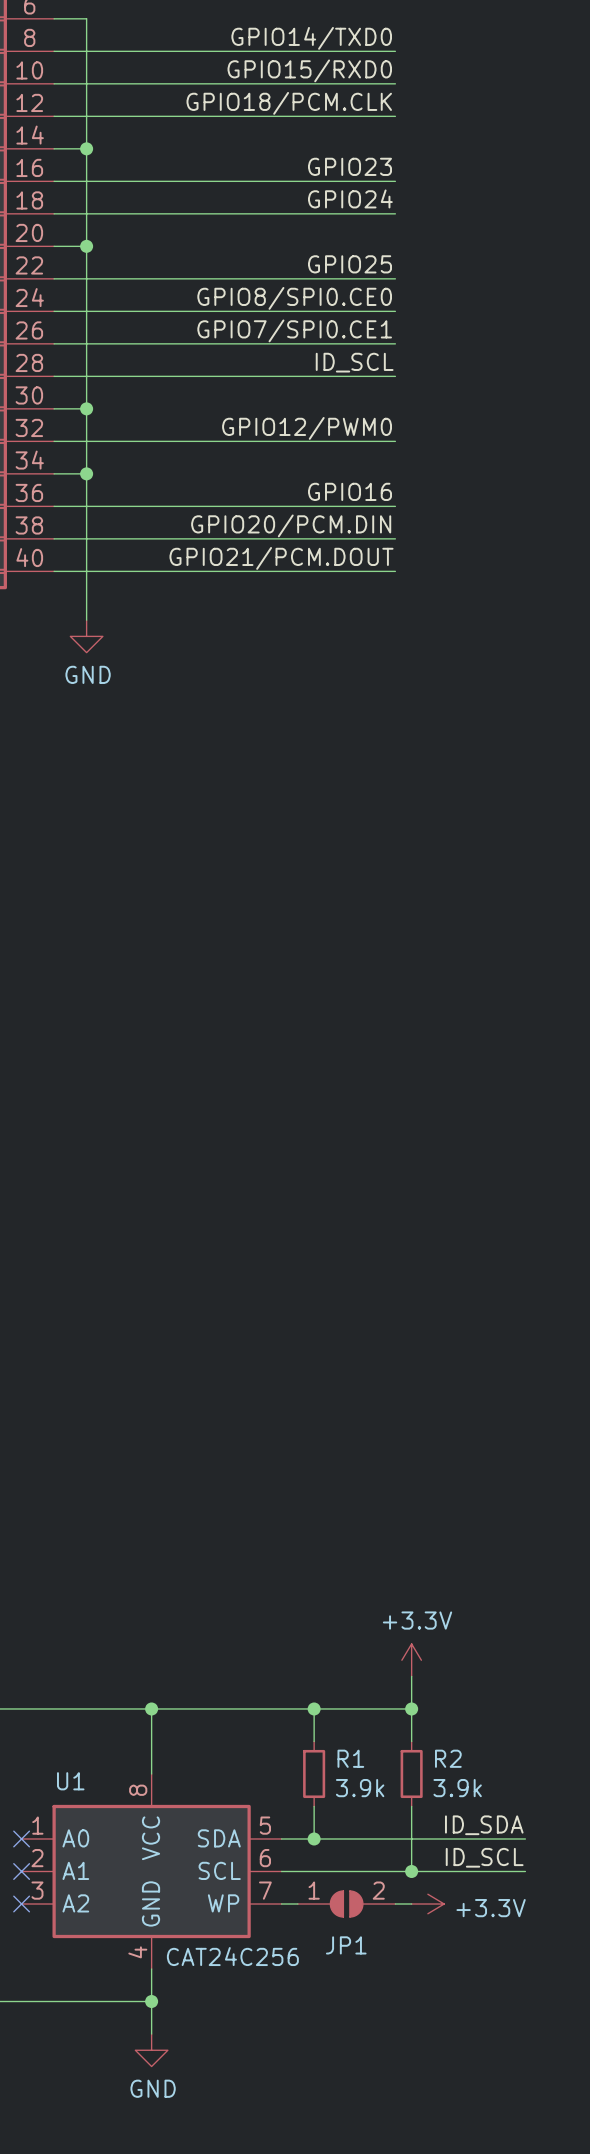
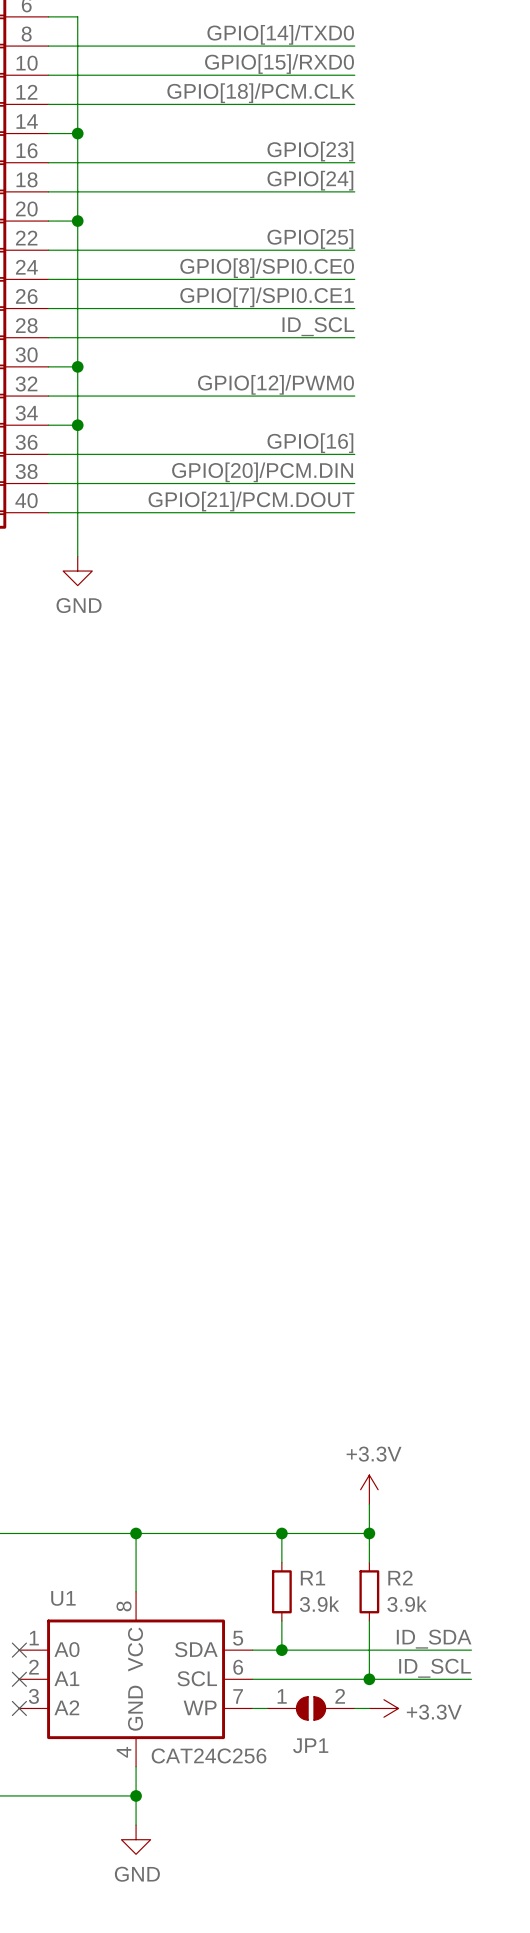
label: GPIO14/TXD0 (311, 38) -> GPIO[14]/TXD0 (280, 34)
label: GPIO15/RXD0 (309, 70) -> GPIO[15]/RXD0 (279, 64)
label: GPIO18/PCM.CLK (289, 103) -> GPIO[18]/PCM.CLK (260, 93)
label: GPIO23 (349, 166) -> GPIO[23] (310, 151)
label: GPIO24 (350, 198) -> GPIO[24] (310, 180)
label: GPIO25 (349, 264) -> GPIO[25] (310, 239)
label: GPIO8/SPI0.CE0 (294, 298) -> GPIO[8]/SPI0.CE0 (267, 268)
label: GPIO7/SPI0.CE1 (294, 330) -> GPIO[7]/SPI0.CE1 (267, 297)
label: GPIO12/PWM0 (307, 428) -> GPIO[12]/PWM0 (275, 384)
label: GPIO16 (349, 491) -> GPIO[16] (310, 443)
label: GPIO20/PCM.DIN (291, 525) -> GPIO[20]/PCM.DIN (262, 472)
label: GPIO21/PCM.DOUT (281, 558) -> GPIO[21]/PCM.DOUT (251, 501)

